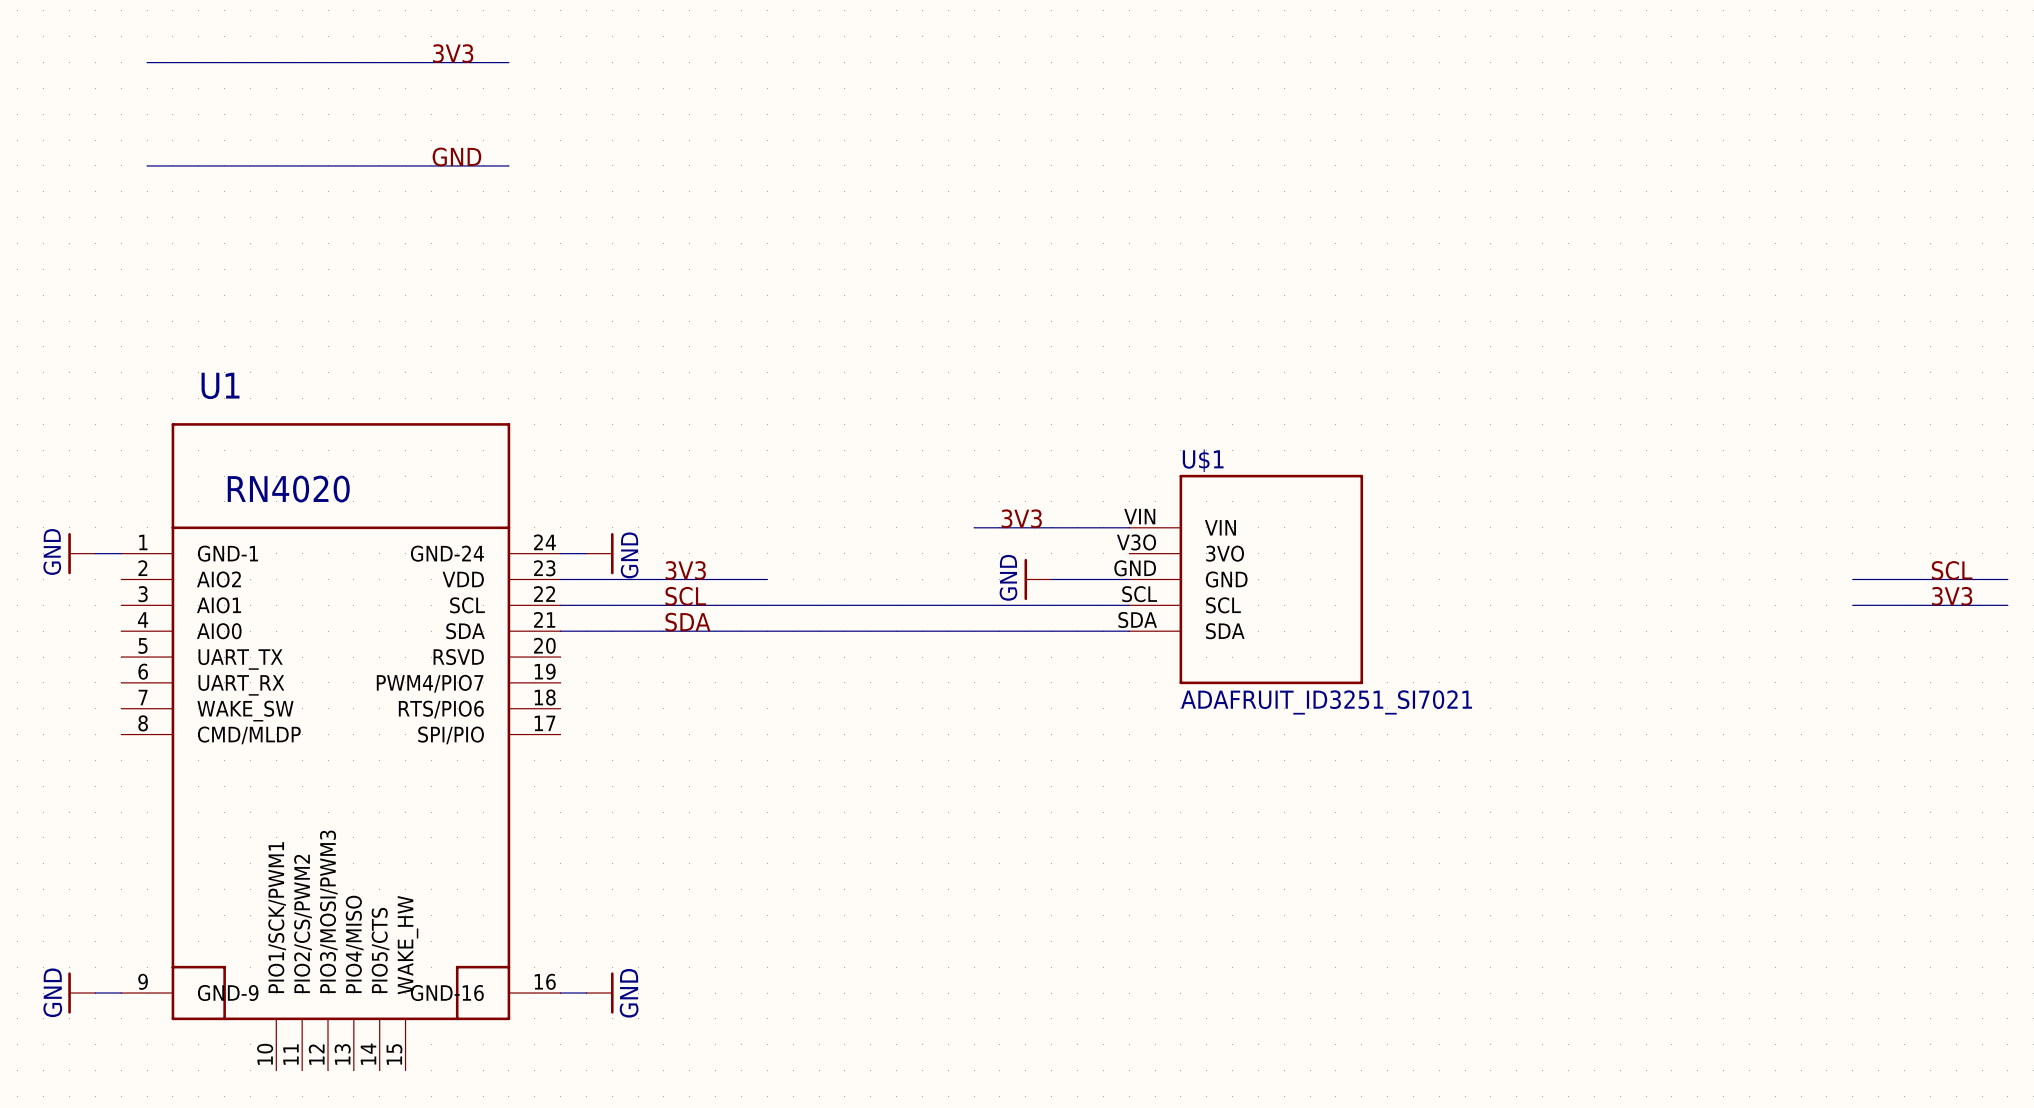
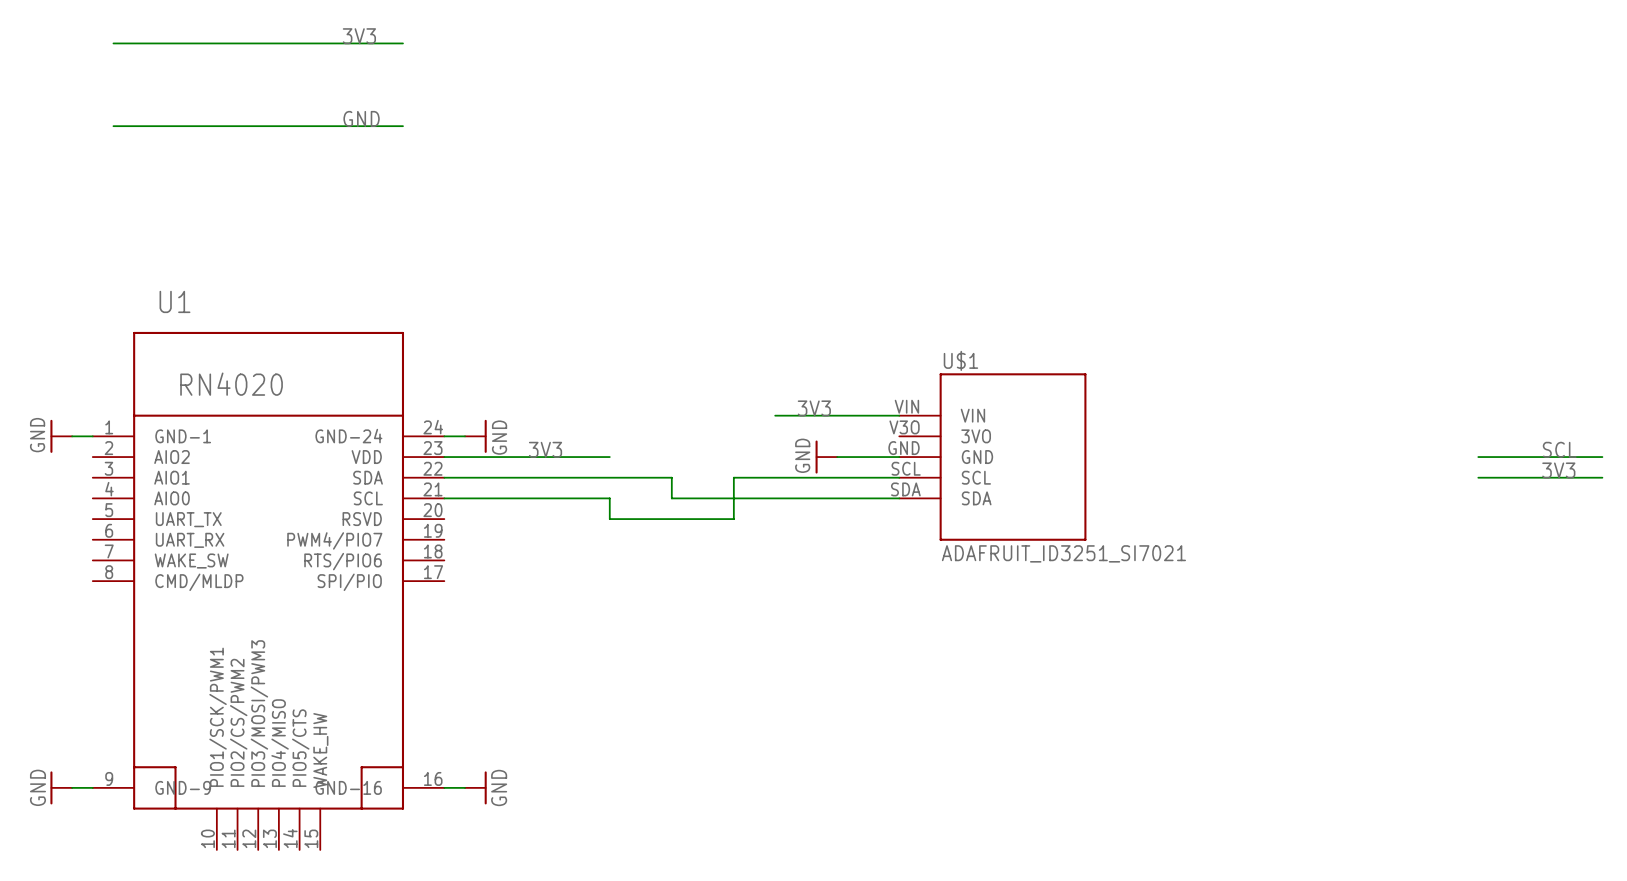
label: SCL (685, 596) -> none
U1 pin name: SCL (467, 605) -> SDA (368, 477)
wire: (844, 605) (922, 605) -> (609, 498) (609, 519) (733, 519) (733, 477)
label: SDA (687, 622) -> none
U1 pin name: SDA (465, 631) -> SCL (368, 498)
wire: (767, 631) (844, 631) -> (671, 477) (671, 498)

